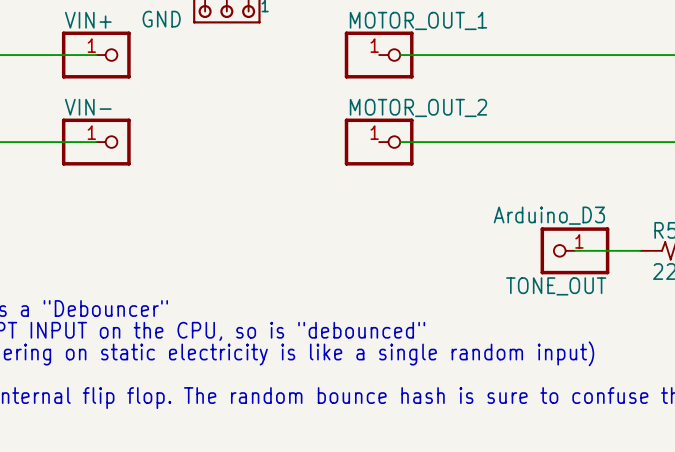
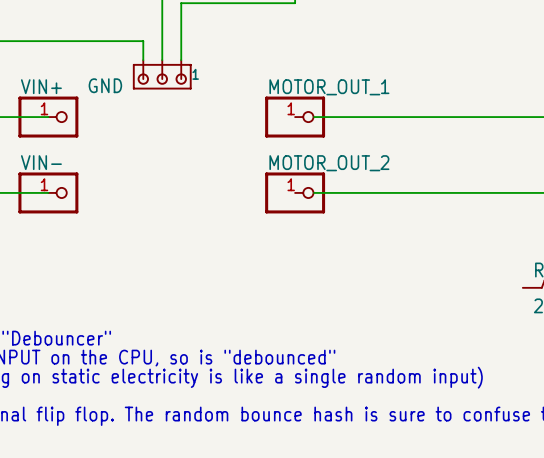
wire: (574, 250) (640, 250) -> none
TONE_OUT: Arduino_D3 (574, 250) -> none

